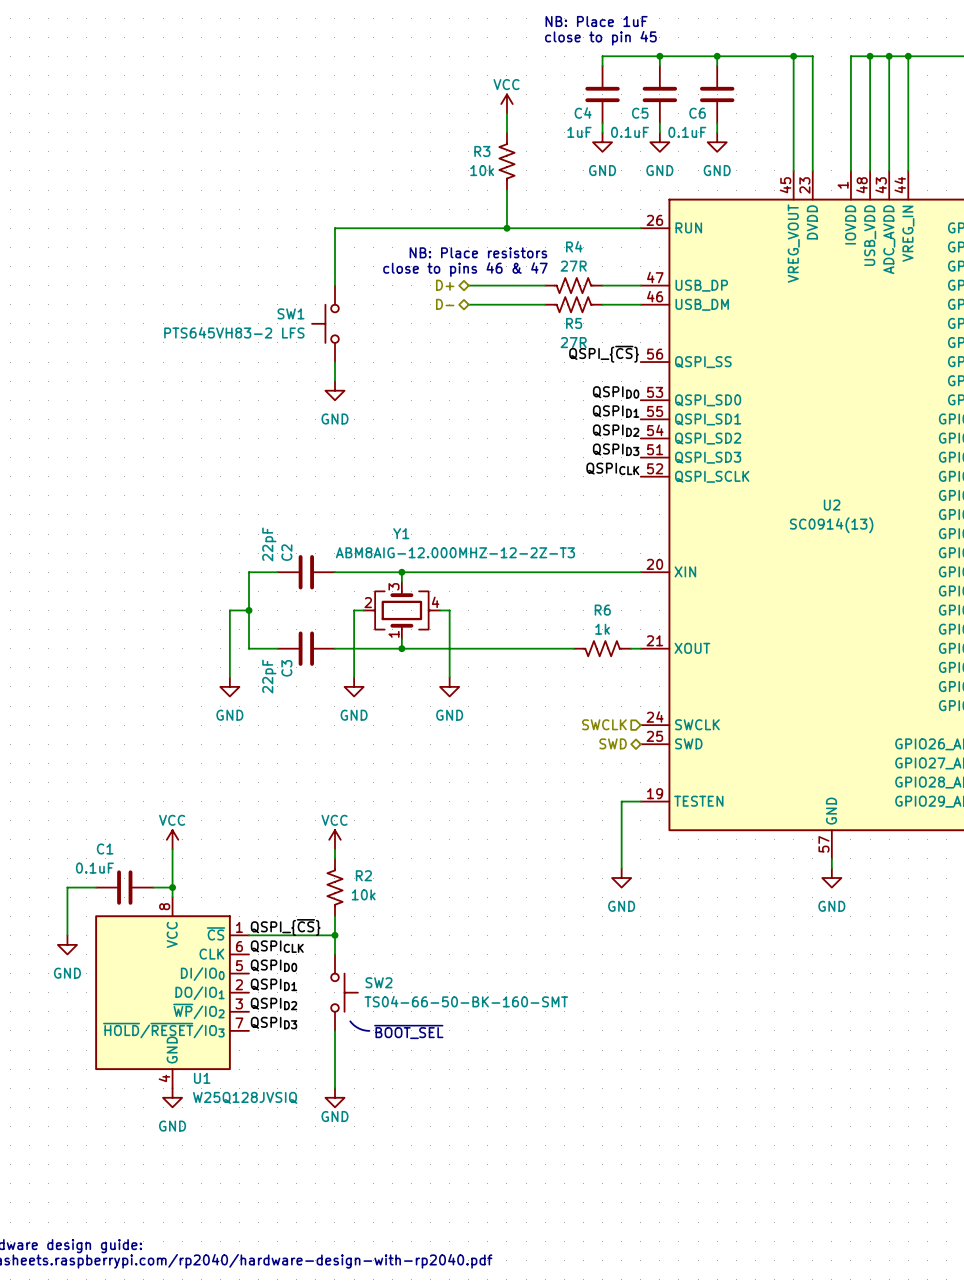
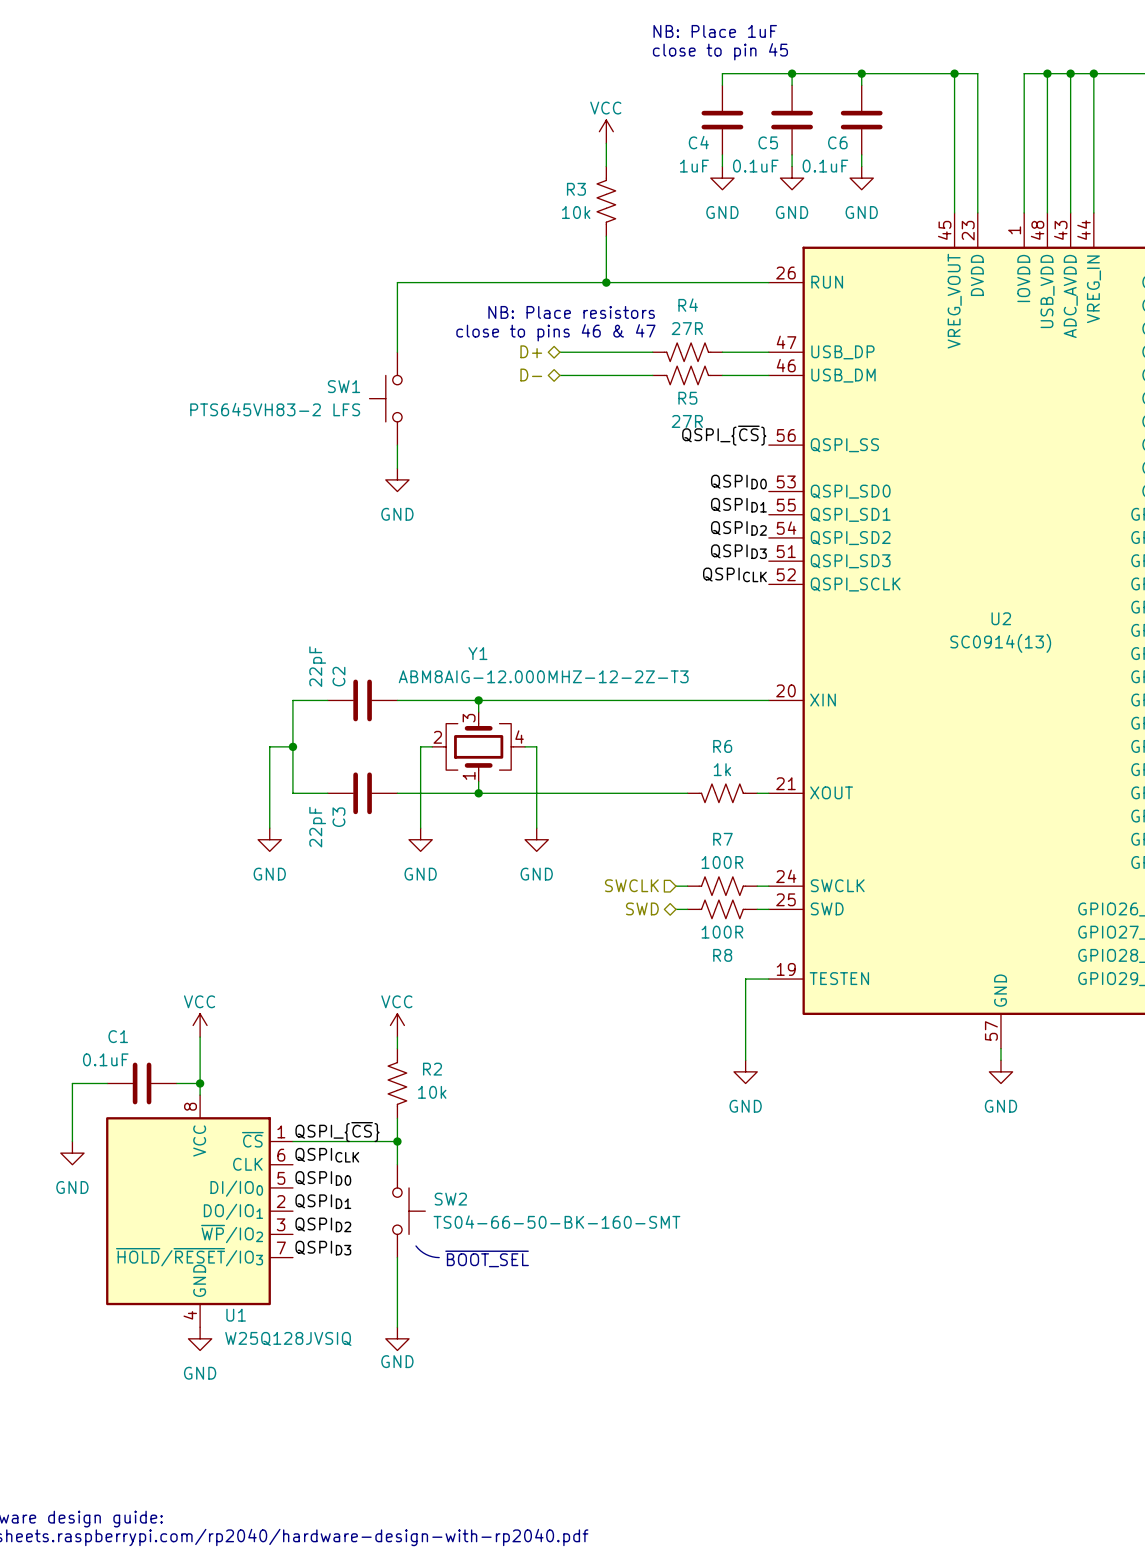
hierarchical label position: SWCLK (604, 724) -> SWCLK (631, 885)
wire: none -> (675, 886) (687, 886)
R7: none -> 100R (722, 886)
wire: none -> (757, 886) (768, 886)
hierarchical label position: SWD (613, 743) -> SWD (642, 908)
wire: none -> (675, 909) (687, 909)
R8: none -> 100R (722, 909)
wire: none -> (757, 909) (768, 909)

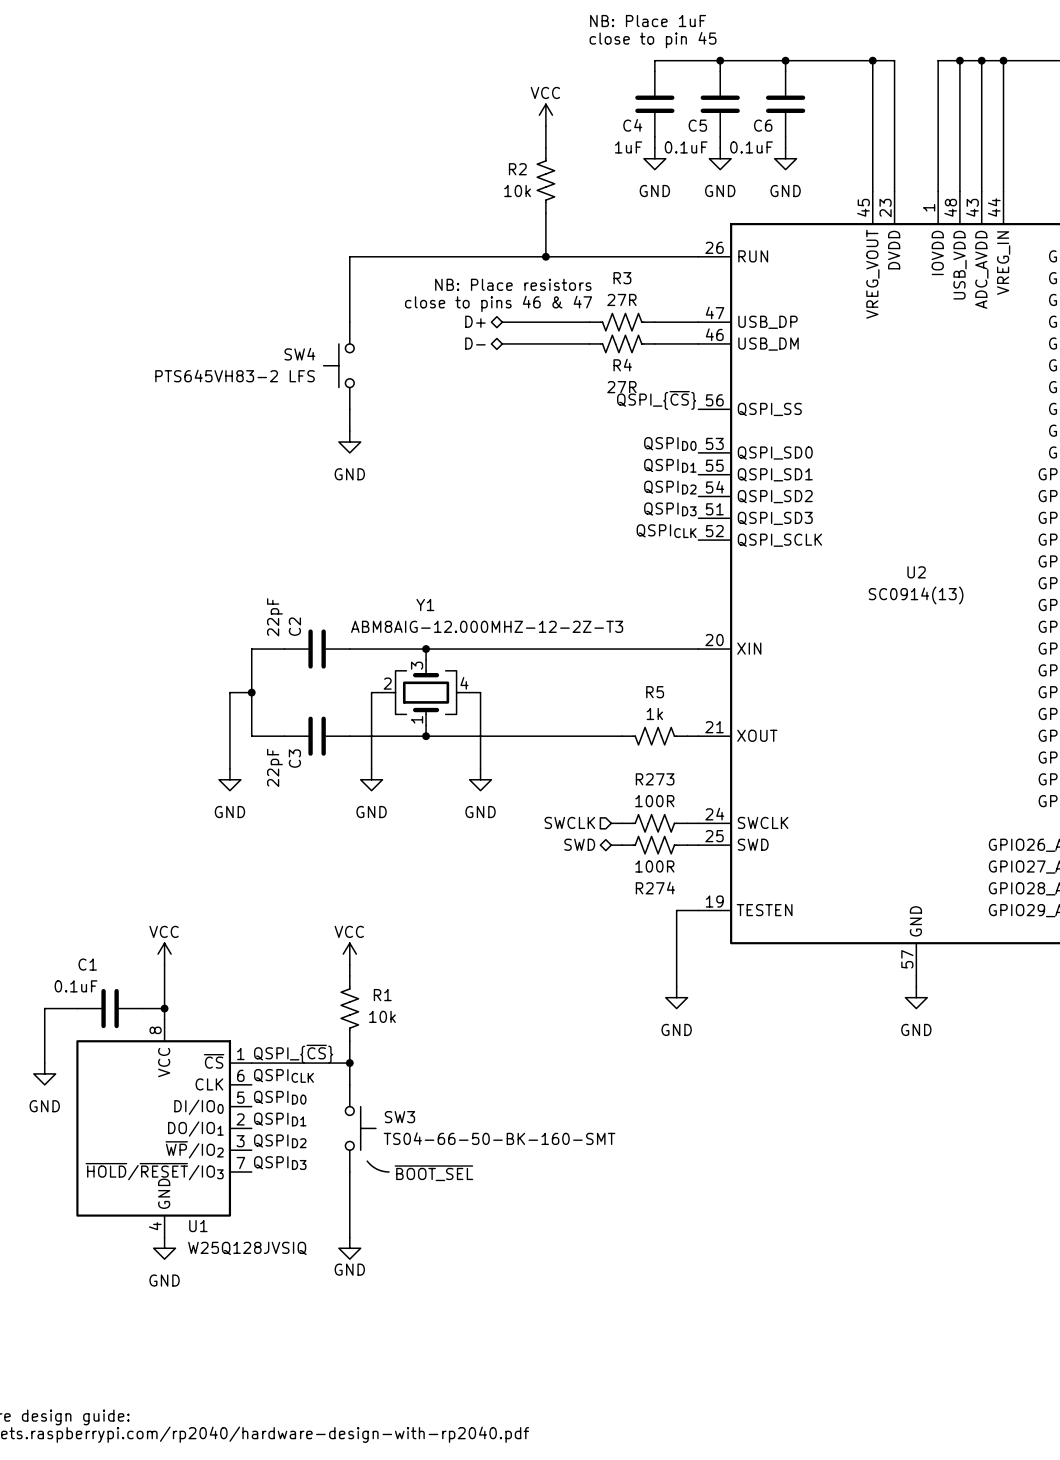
R3 name: R3 (576, 189) -> R2 (517, 169)
R4 name: R4 (688, 305) -> R3 (622, 278)
SW1 name: SW1 (343, 386) -> SW4 (299, 354)
R5 name: R5 (687, 398) -> R4 (622, 365)
R6 name: R6 (722, 746) -> R5 (655, 692)
R7 name: R7 (722, 839) -> R273 (655, 779)
R8 name: R8 (722, 955) -> R274 (655, 888)
R2 name: R2 (432, 1069) -> R1 (382, 995)
SW2 name: SW2 (450, 1199) -> SW3 (399, 1117)

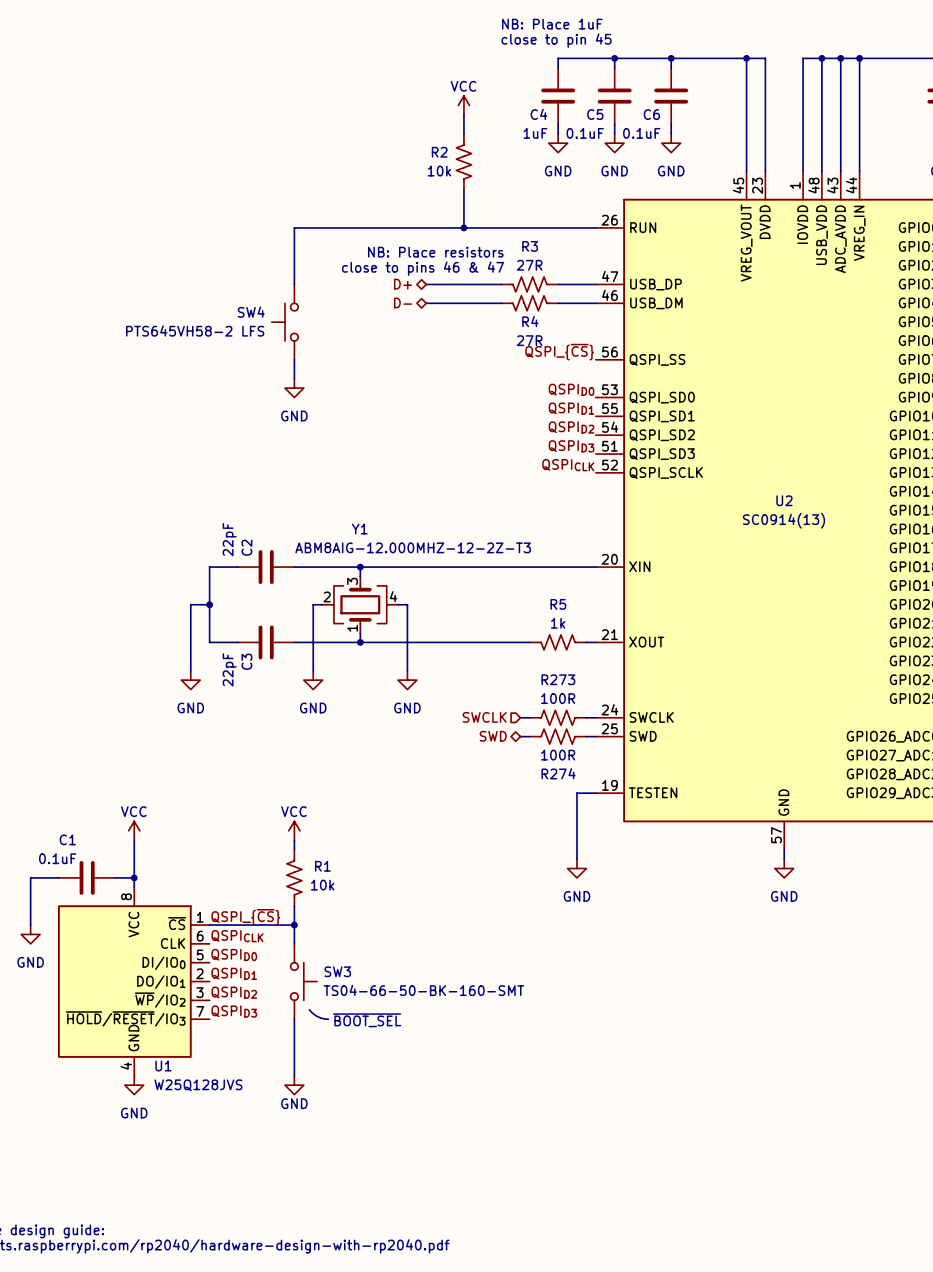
SW4 value: PTS645VH83-2 LFS (235, 375) -> PTS645VH58-2 LFS (195, 330)
U1 value: W25Q128JVSIQ (247, 1248) -> W25Q128JVS (198, 1085)

